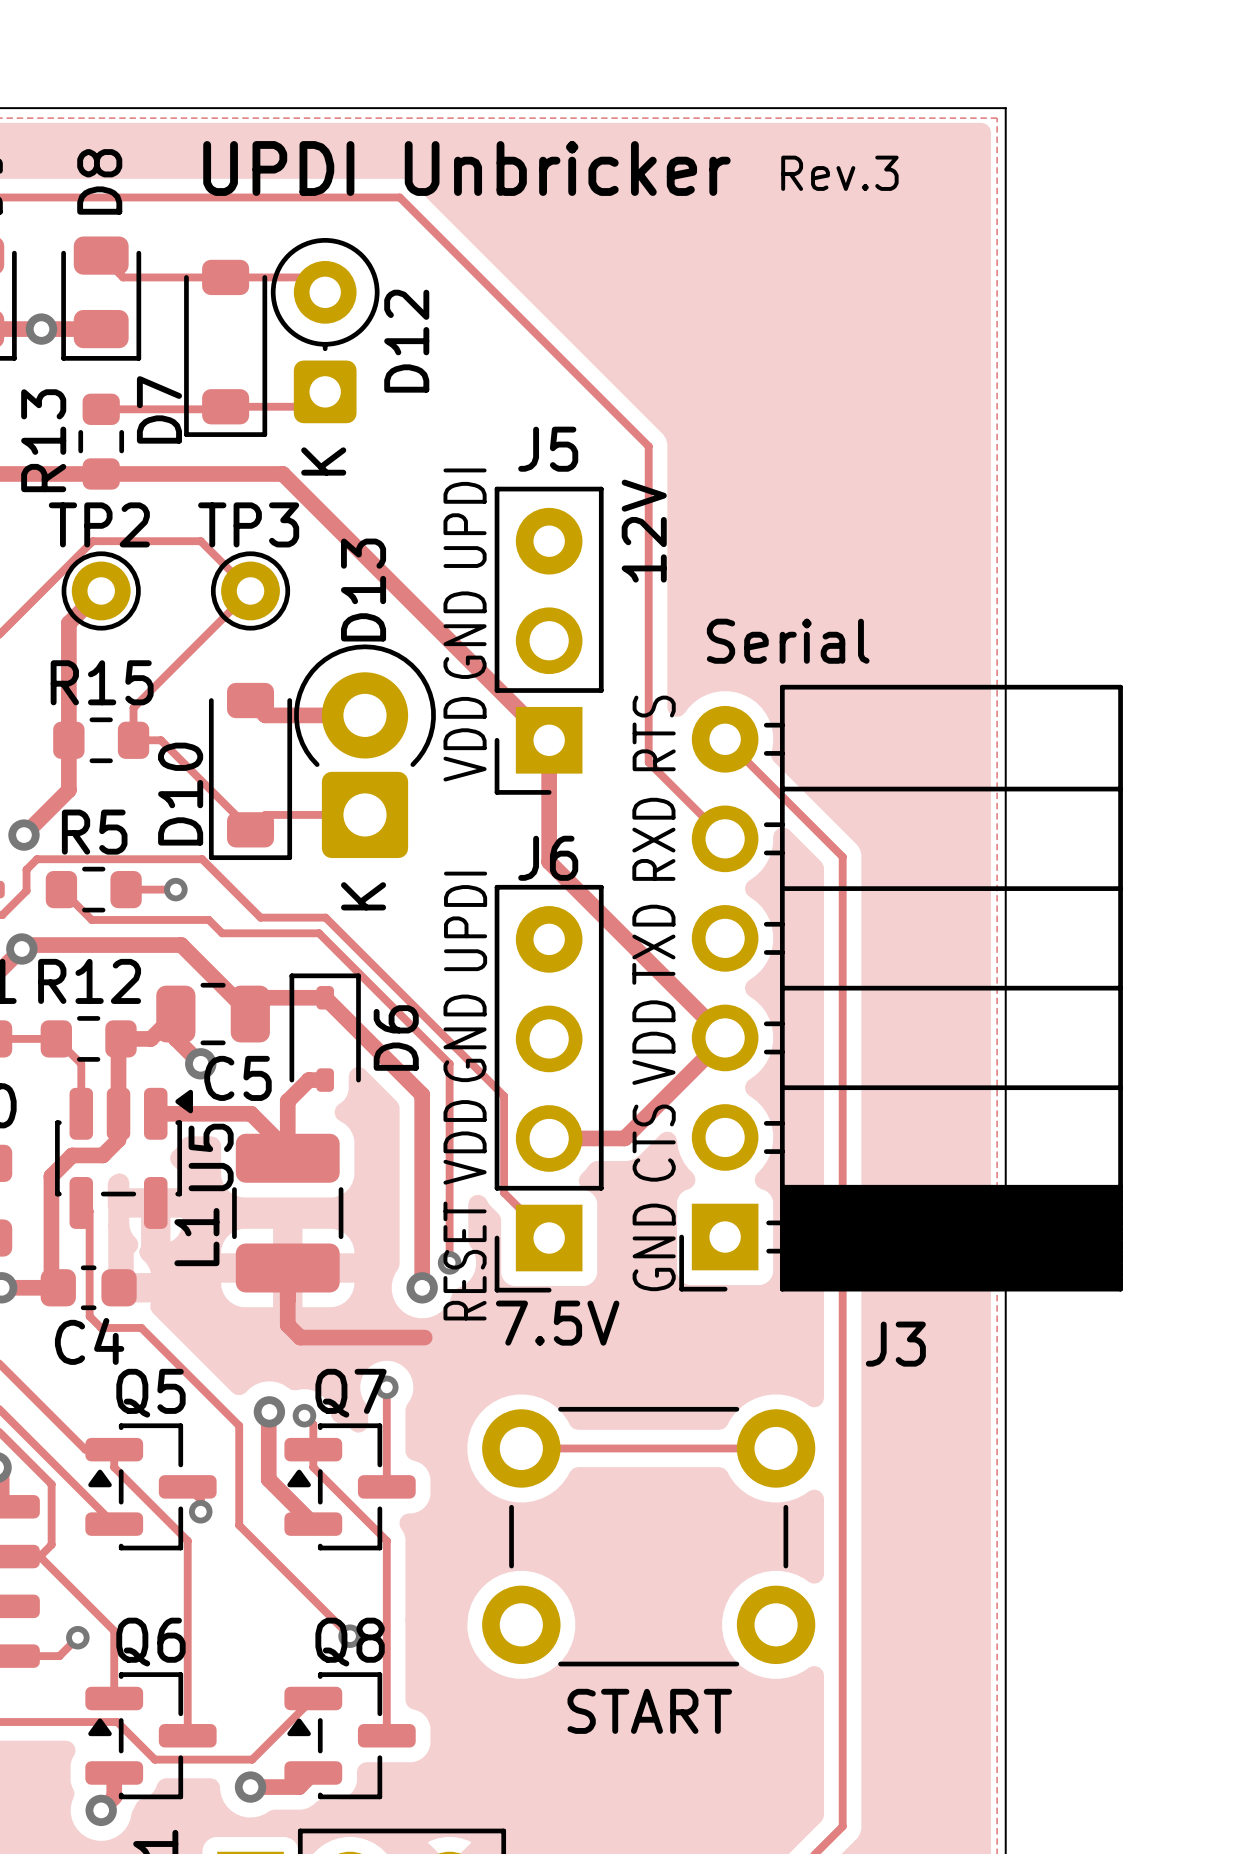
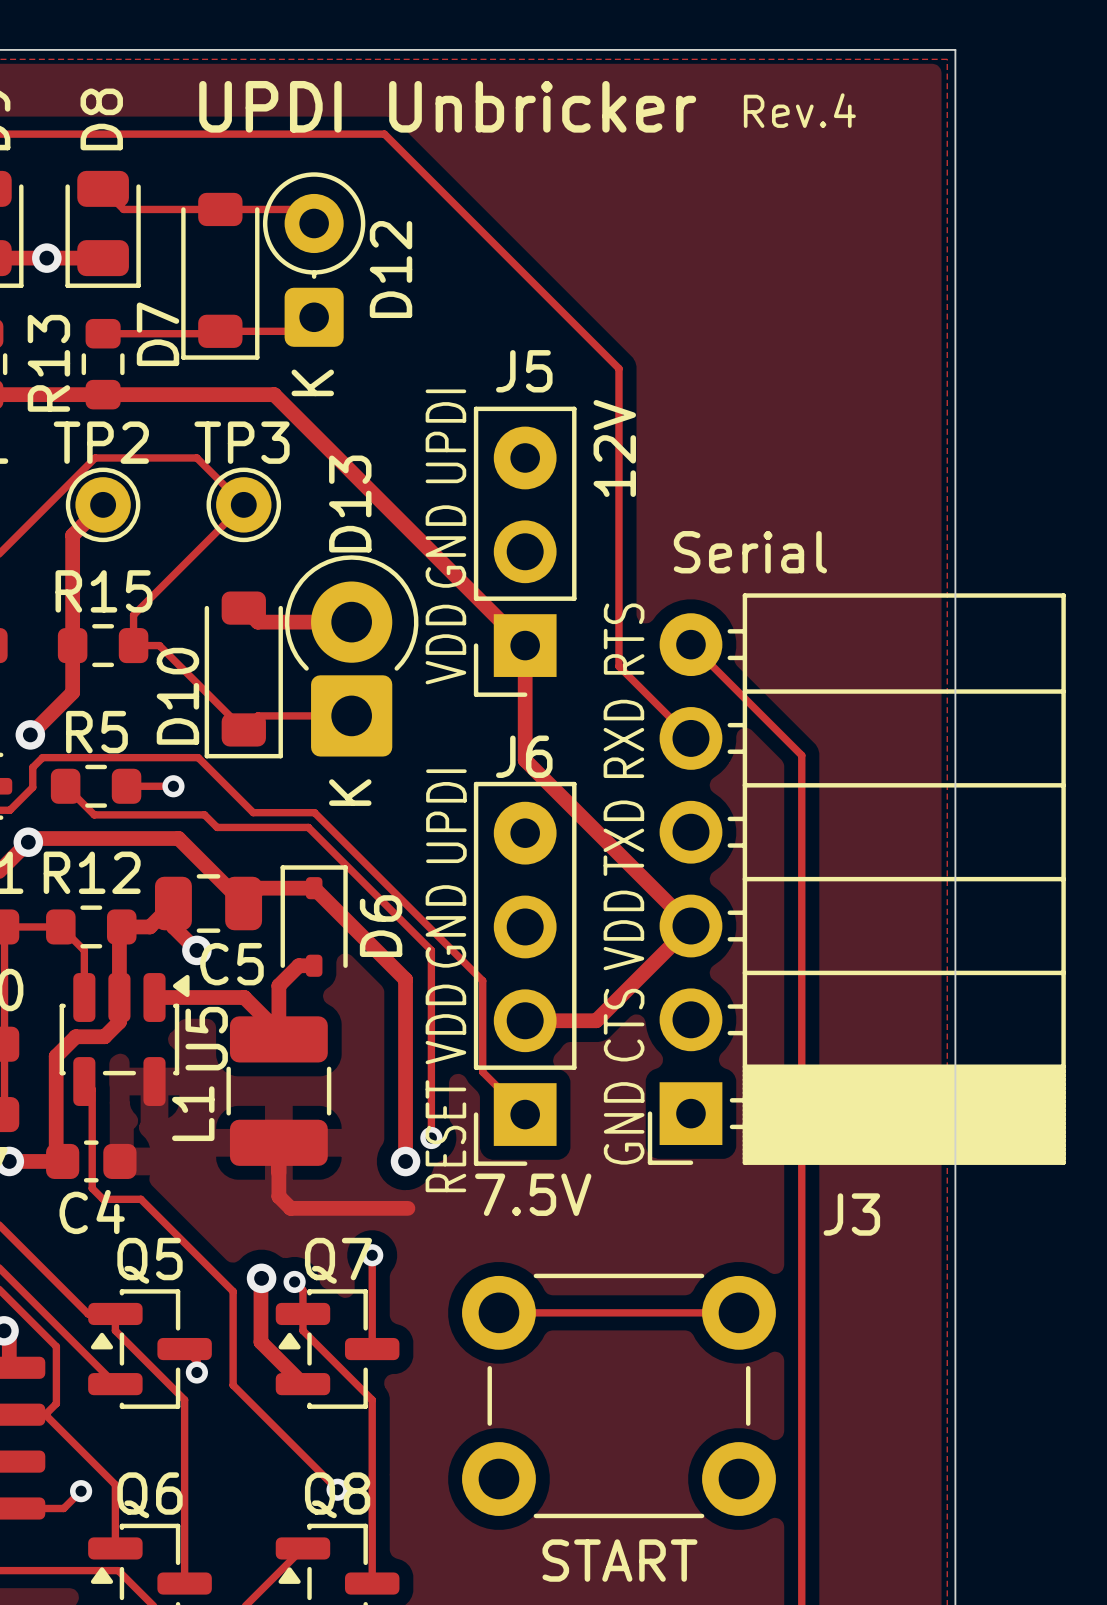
text: Rev.3 (839, 173) -> Rev.4 (799, 110)

